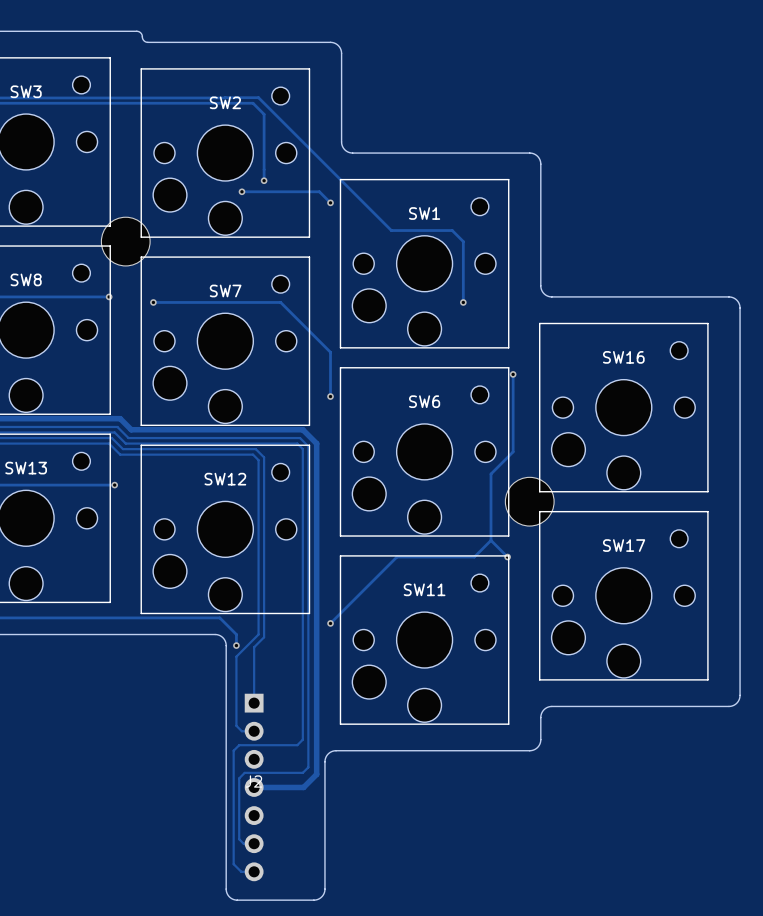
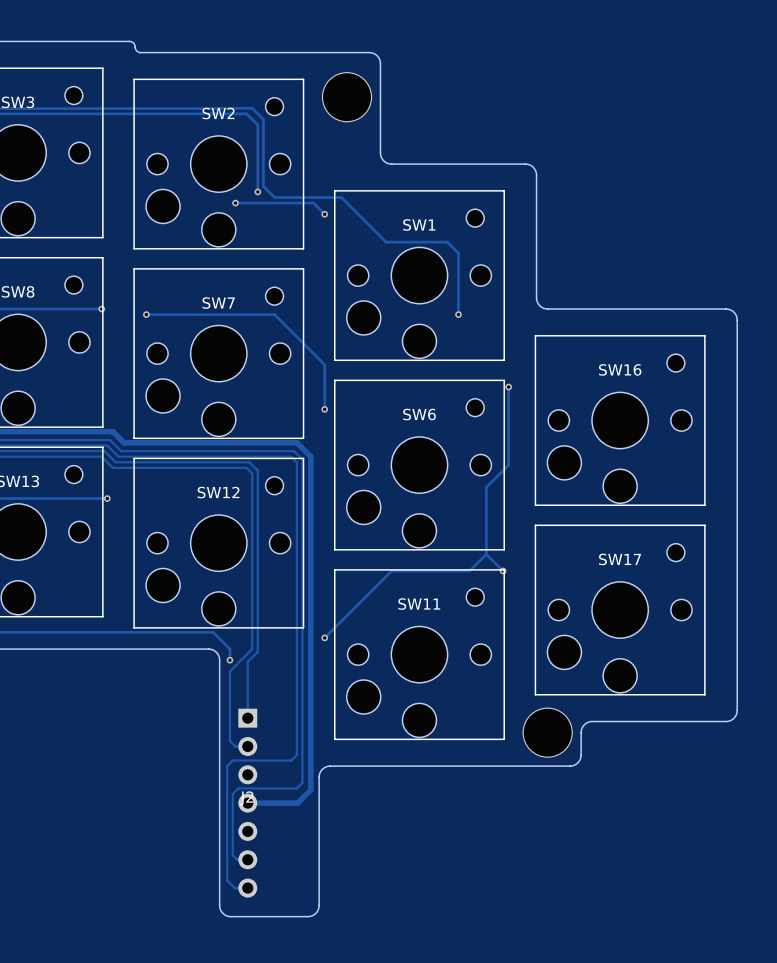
board edge: (330, 42) (338, 45) (341, 52) (341, 141) (343, 147) (351, 152) (396, 153) -> (324, 52) (370, 52) (378, 57) (380, 63) (380, 154) (383, 160) (391, 164)
part: none -> (347, 97)
track: (269, 108) (347, 186) -> (263, 119) (263, 186) (274, 197) (341, 197)
part: (125, 241) -> none
part position: (529, 501) -> (547, 732)
board edge: (596, 706) (545, 708) (540, 716) (540, 743) (535, 749) (529, 750) -> (592, 721) (586, 723) (581, 728) (581, 756) (575, 764) (569, 766) (525, 766)

